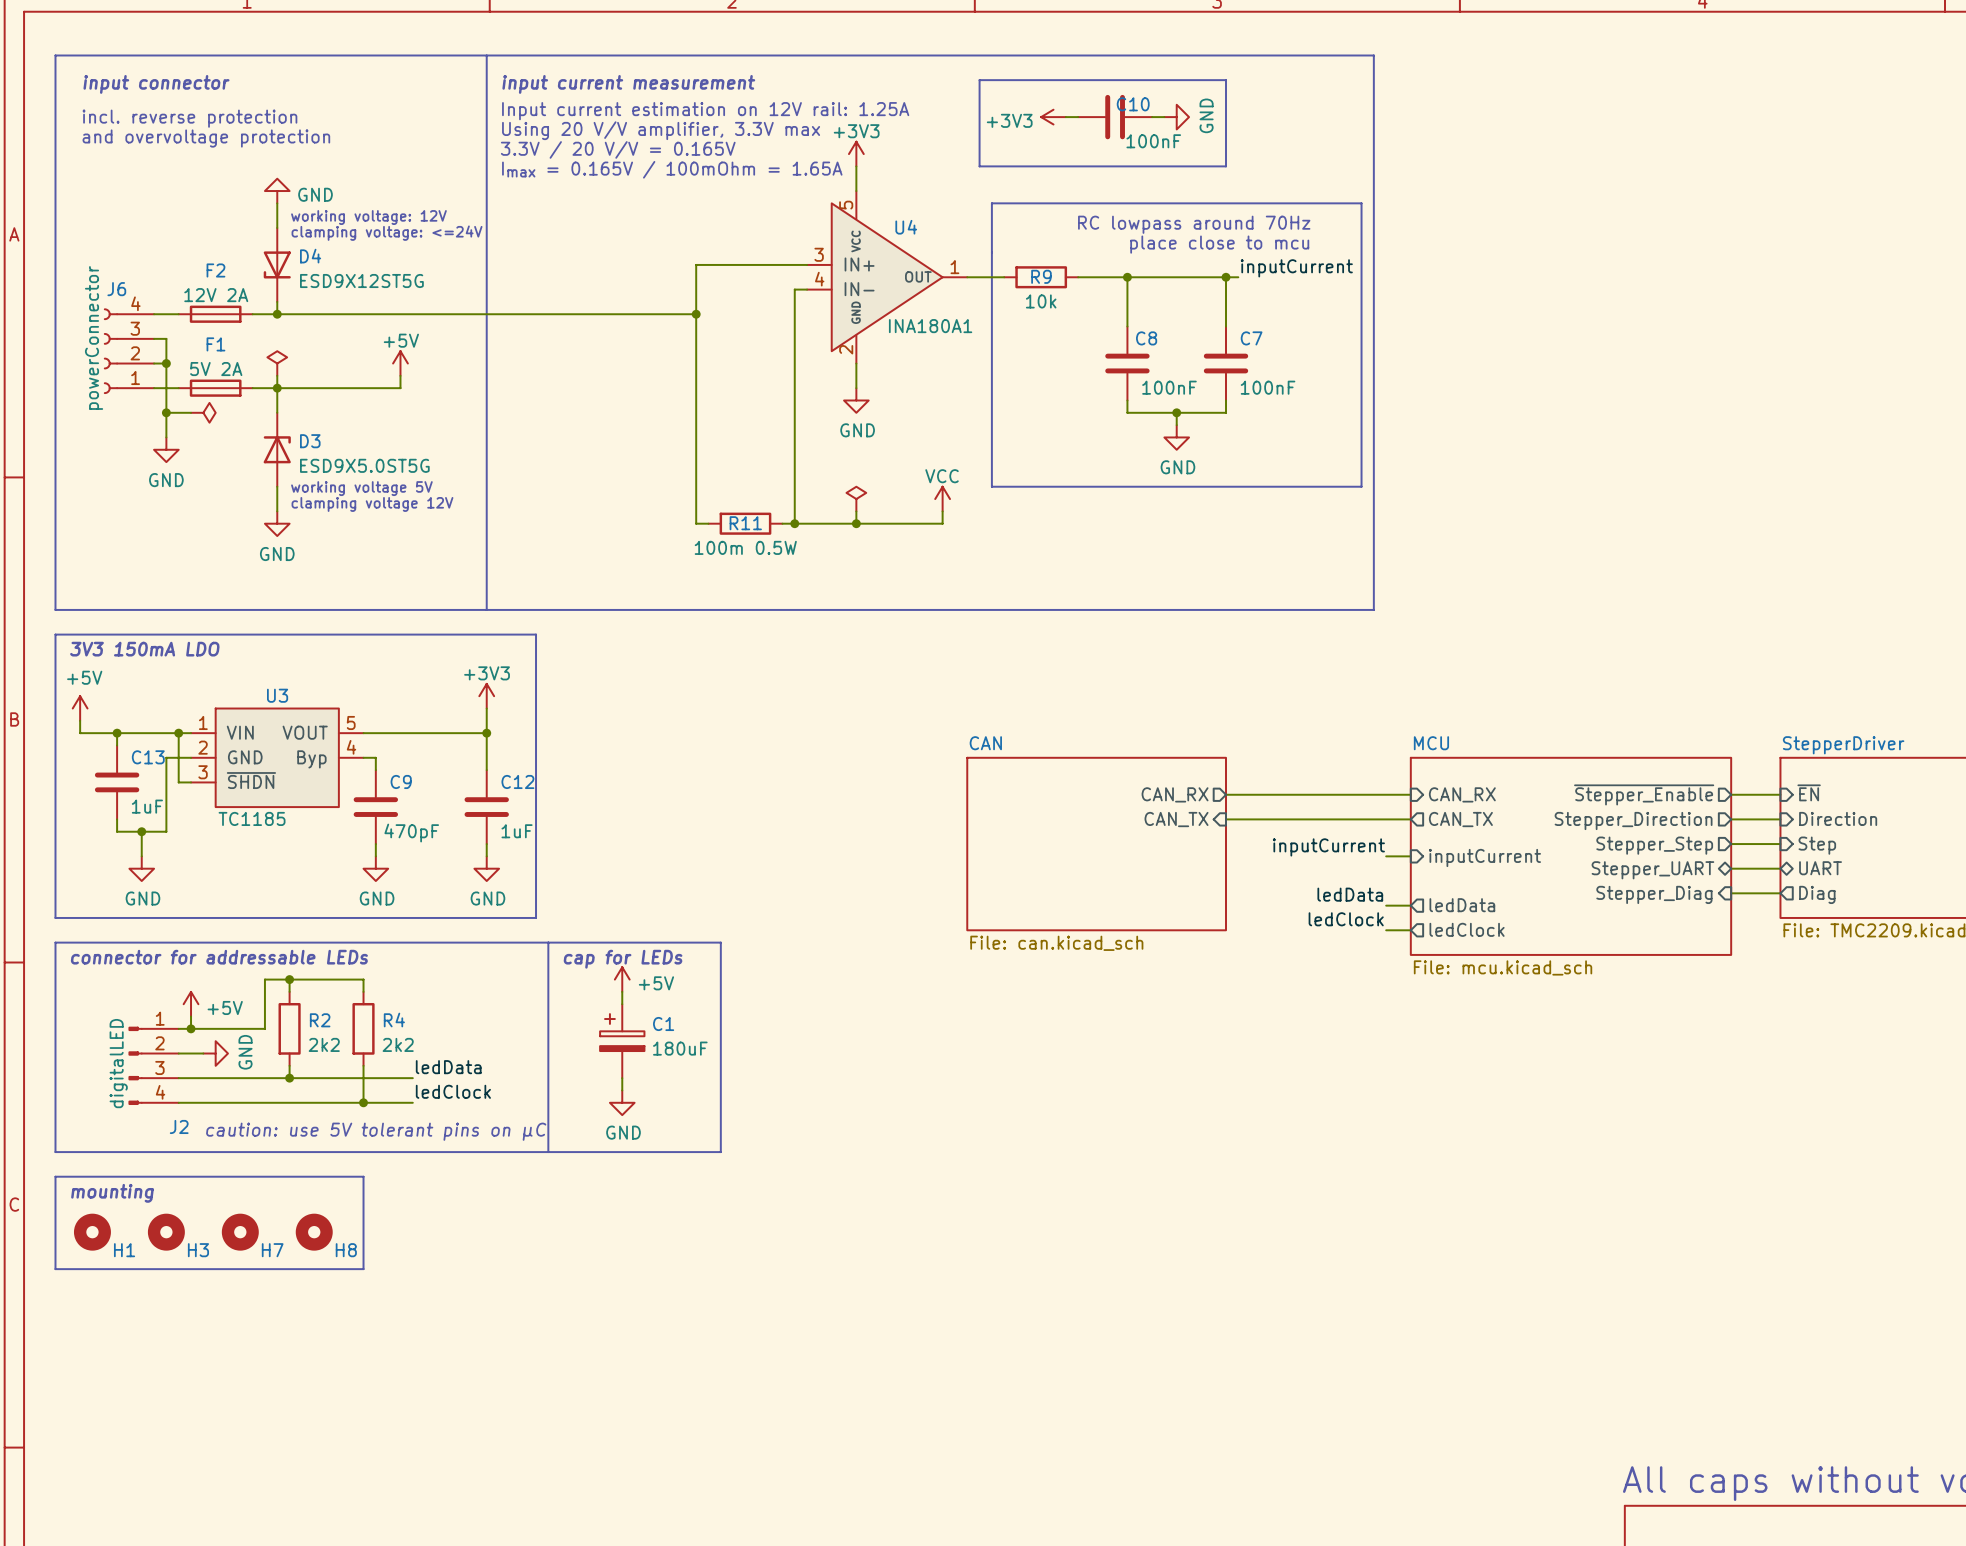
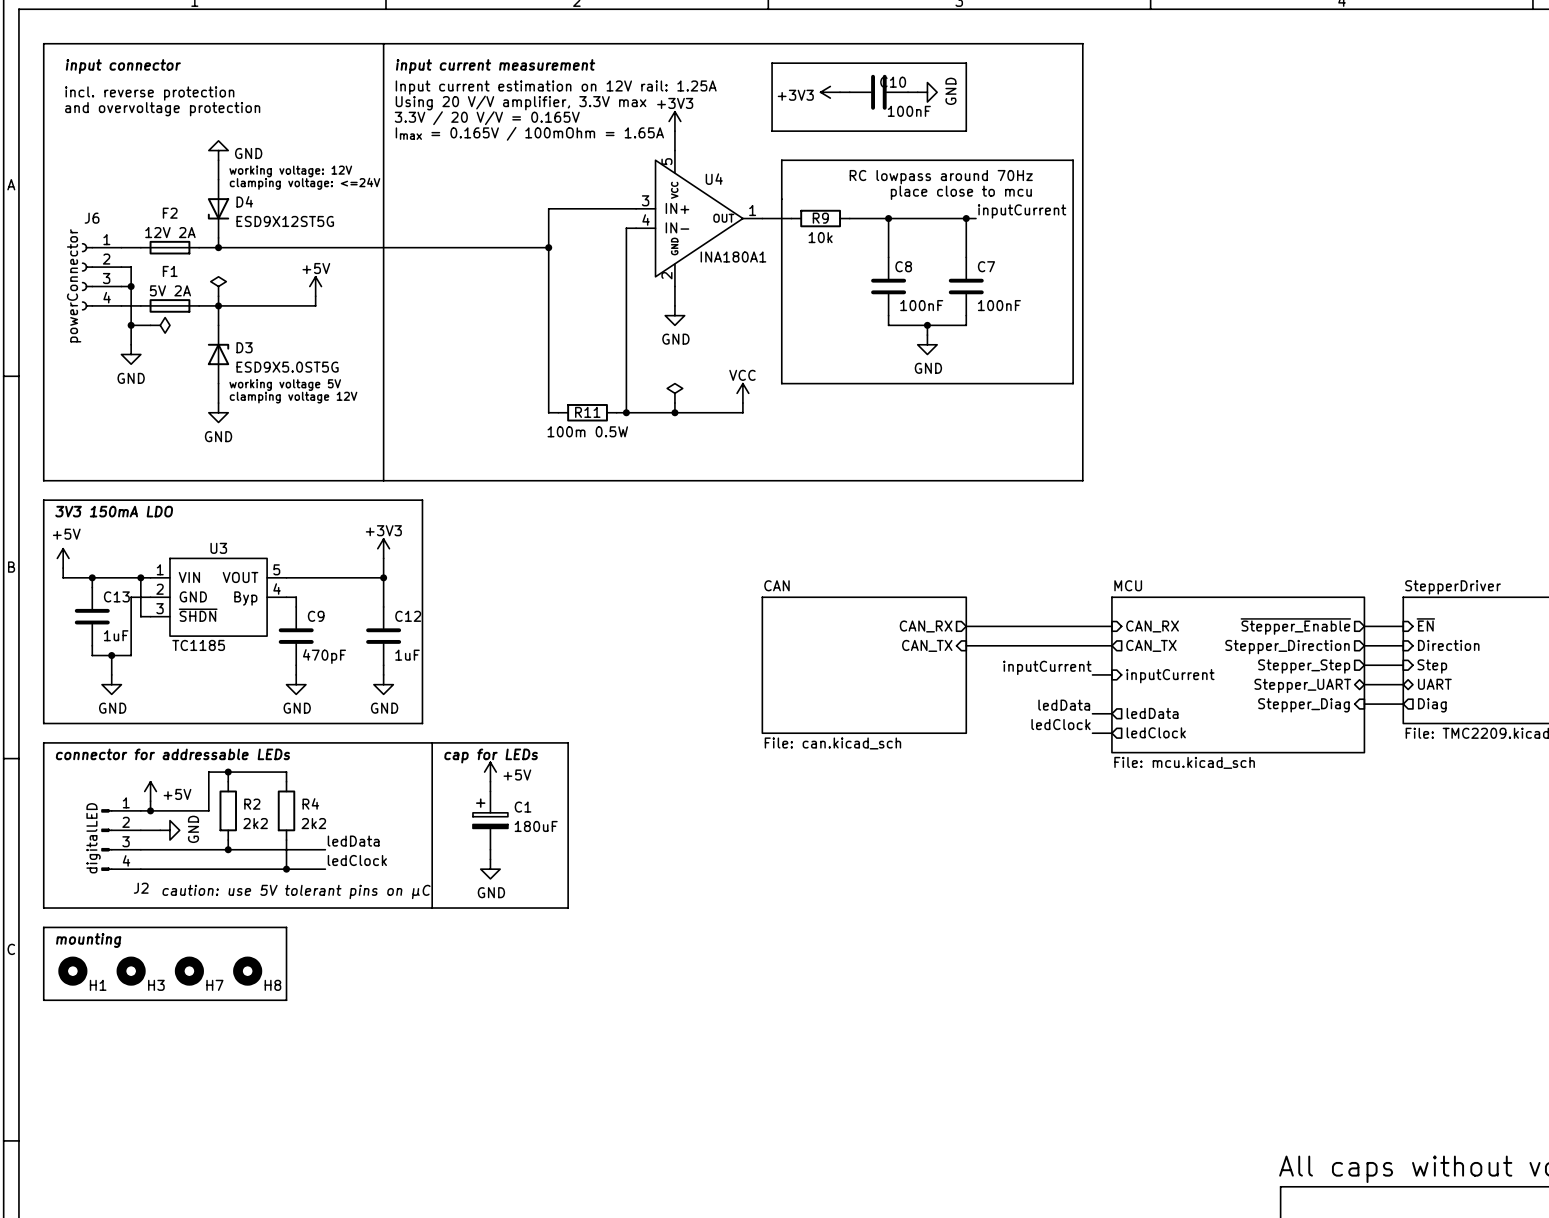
J6 flip: as is (110, 351) -> up-down (87, 276)

